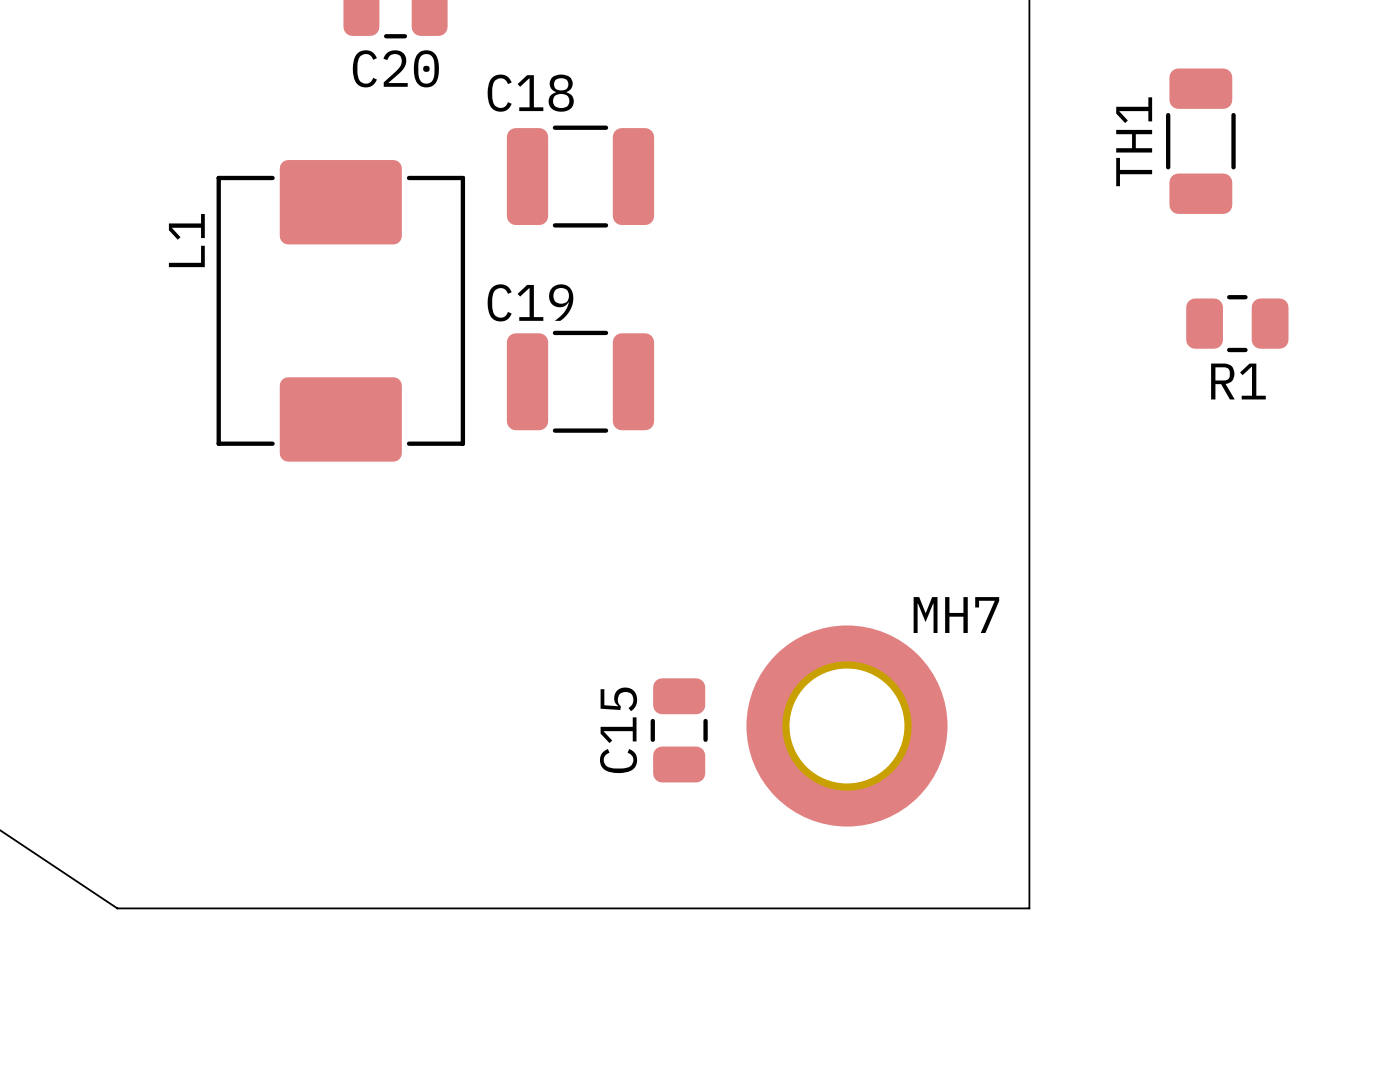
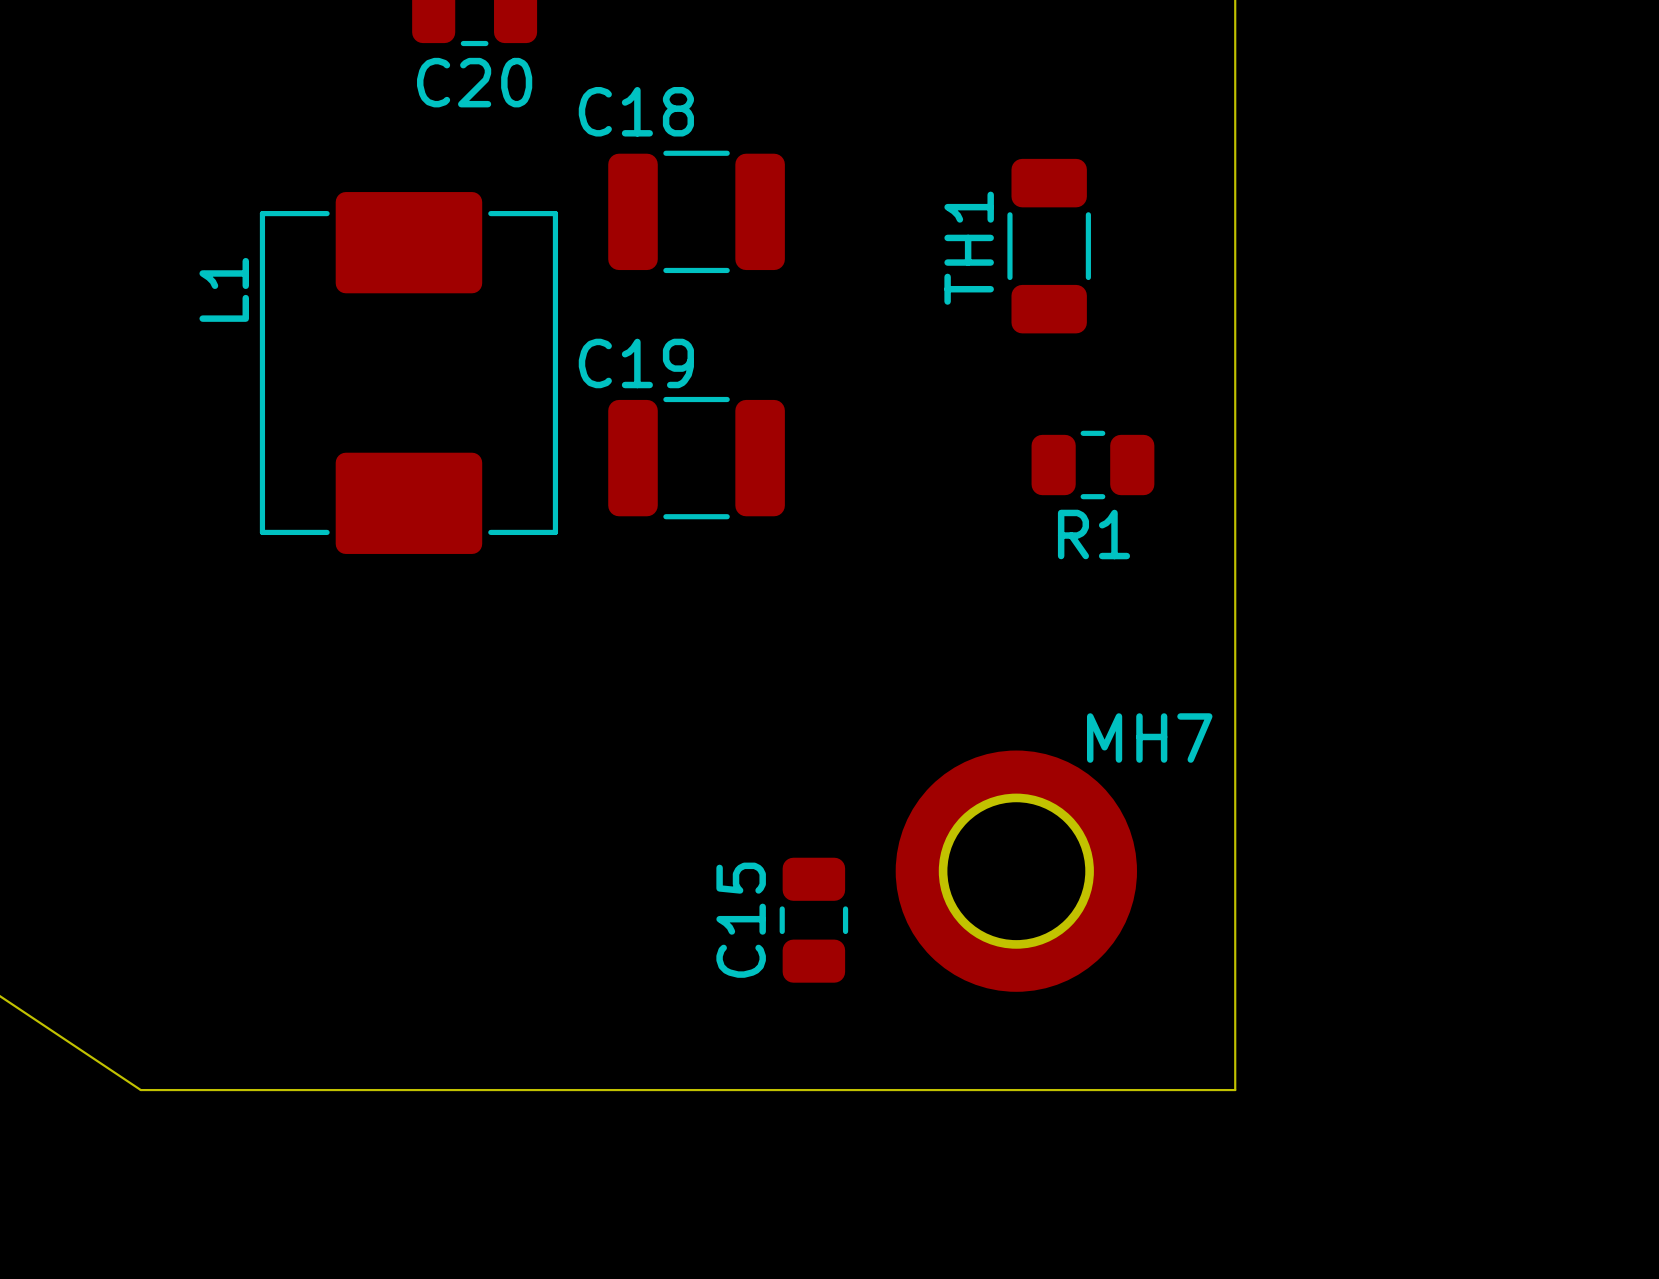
TH1 position: (1200, 141) -> (1049, 246)
R1 position: (1237, 323) -> (1092, 465)
C15 position: (679, 730) -> (813, 920)

